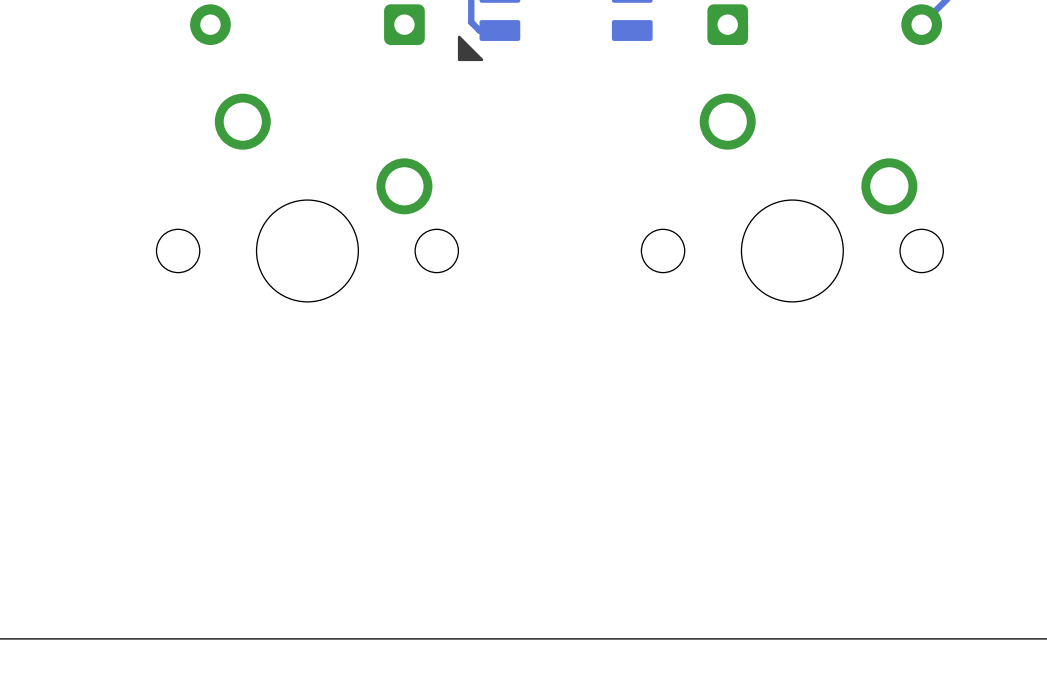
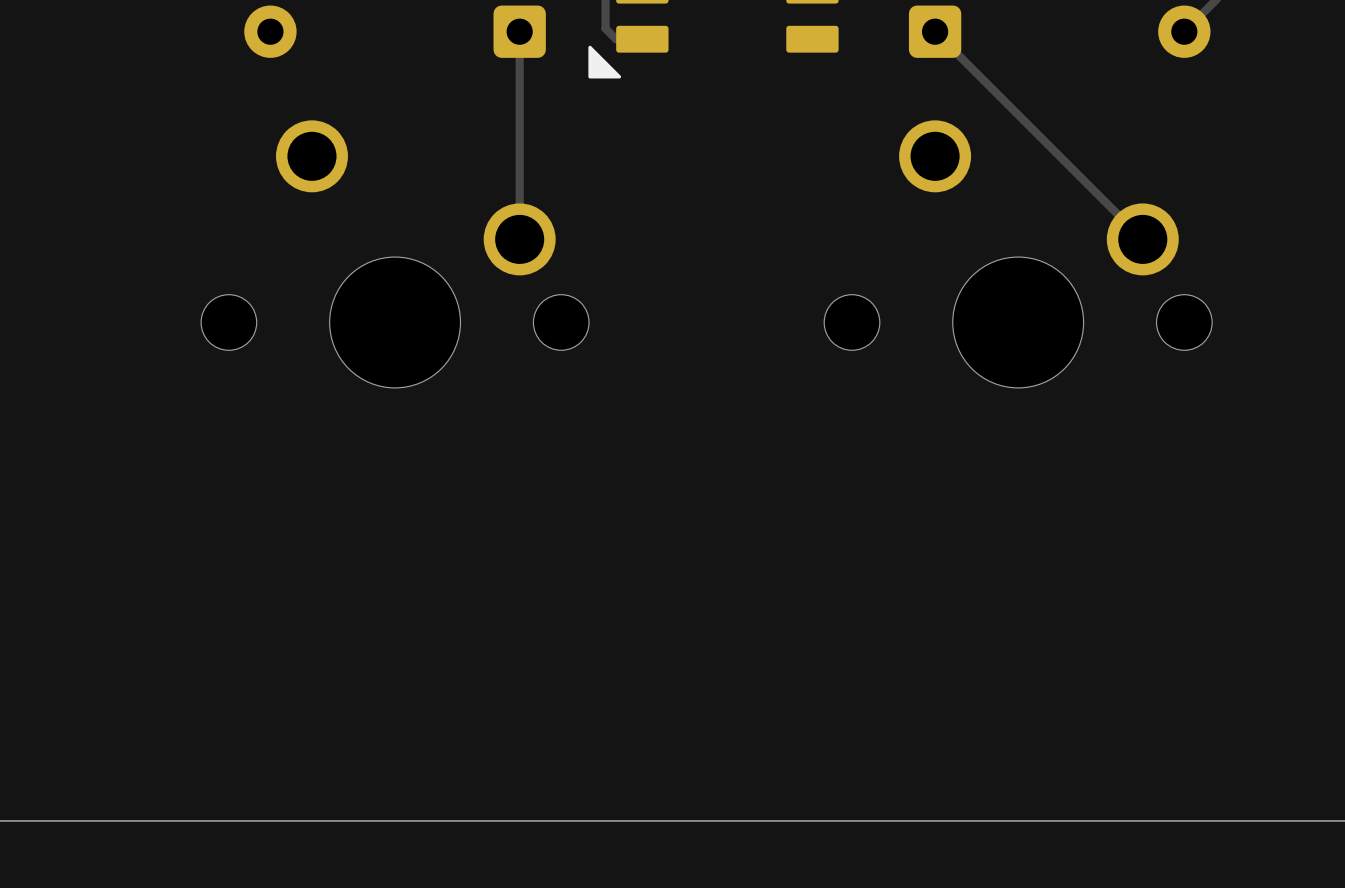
track: none -> (519, 31) (519, 239)
track: none -> (935, 31) (1142, 239)

